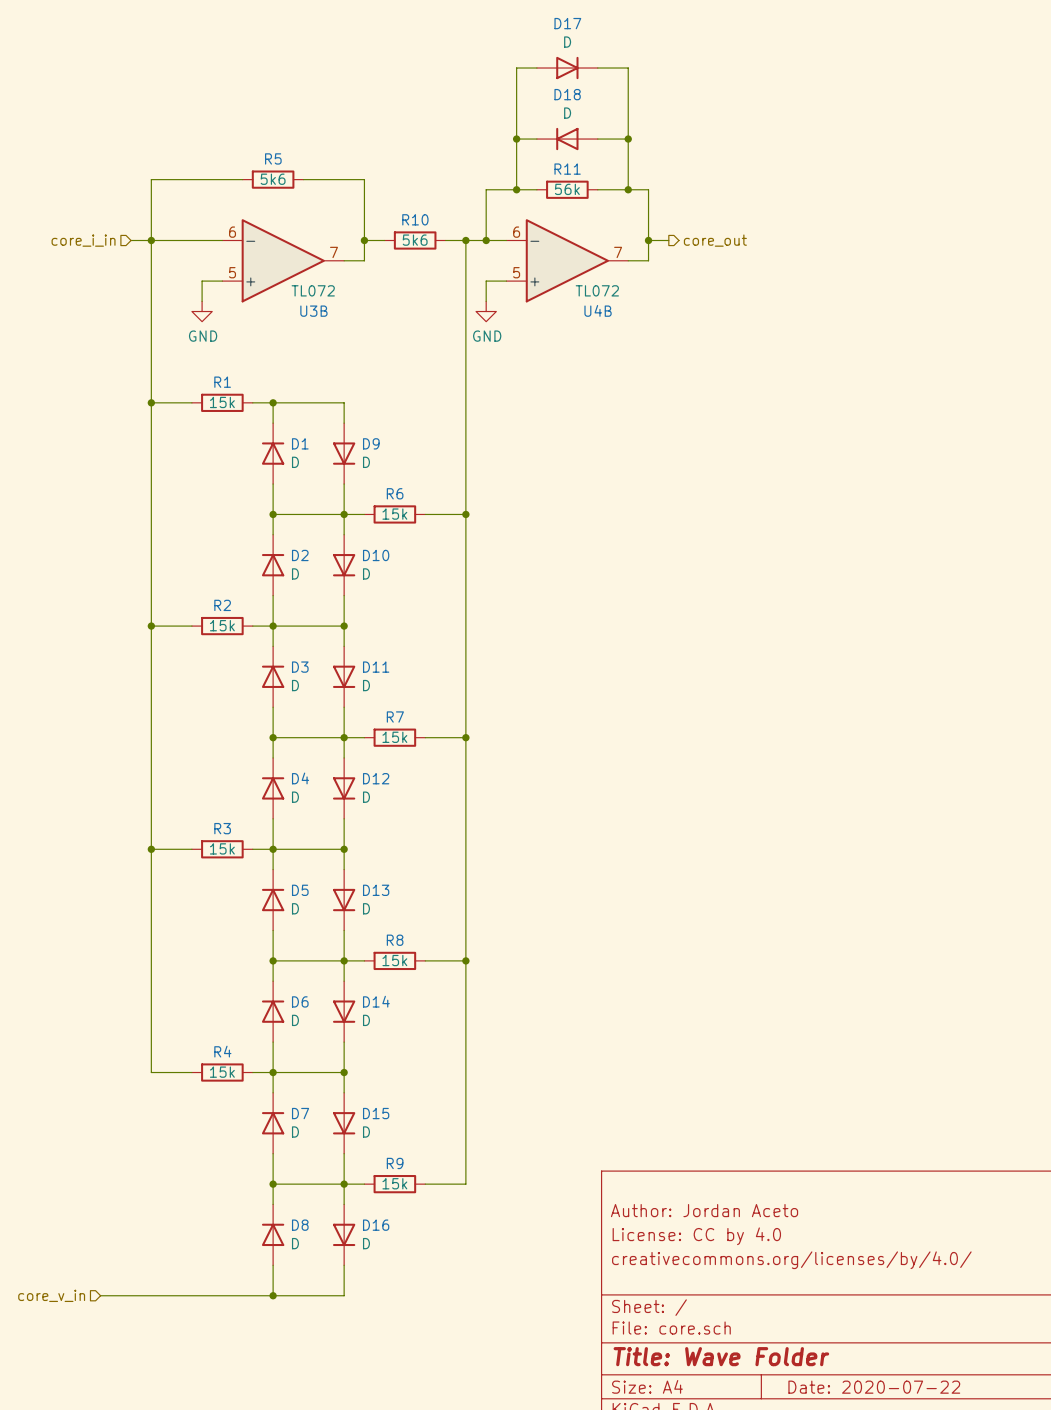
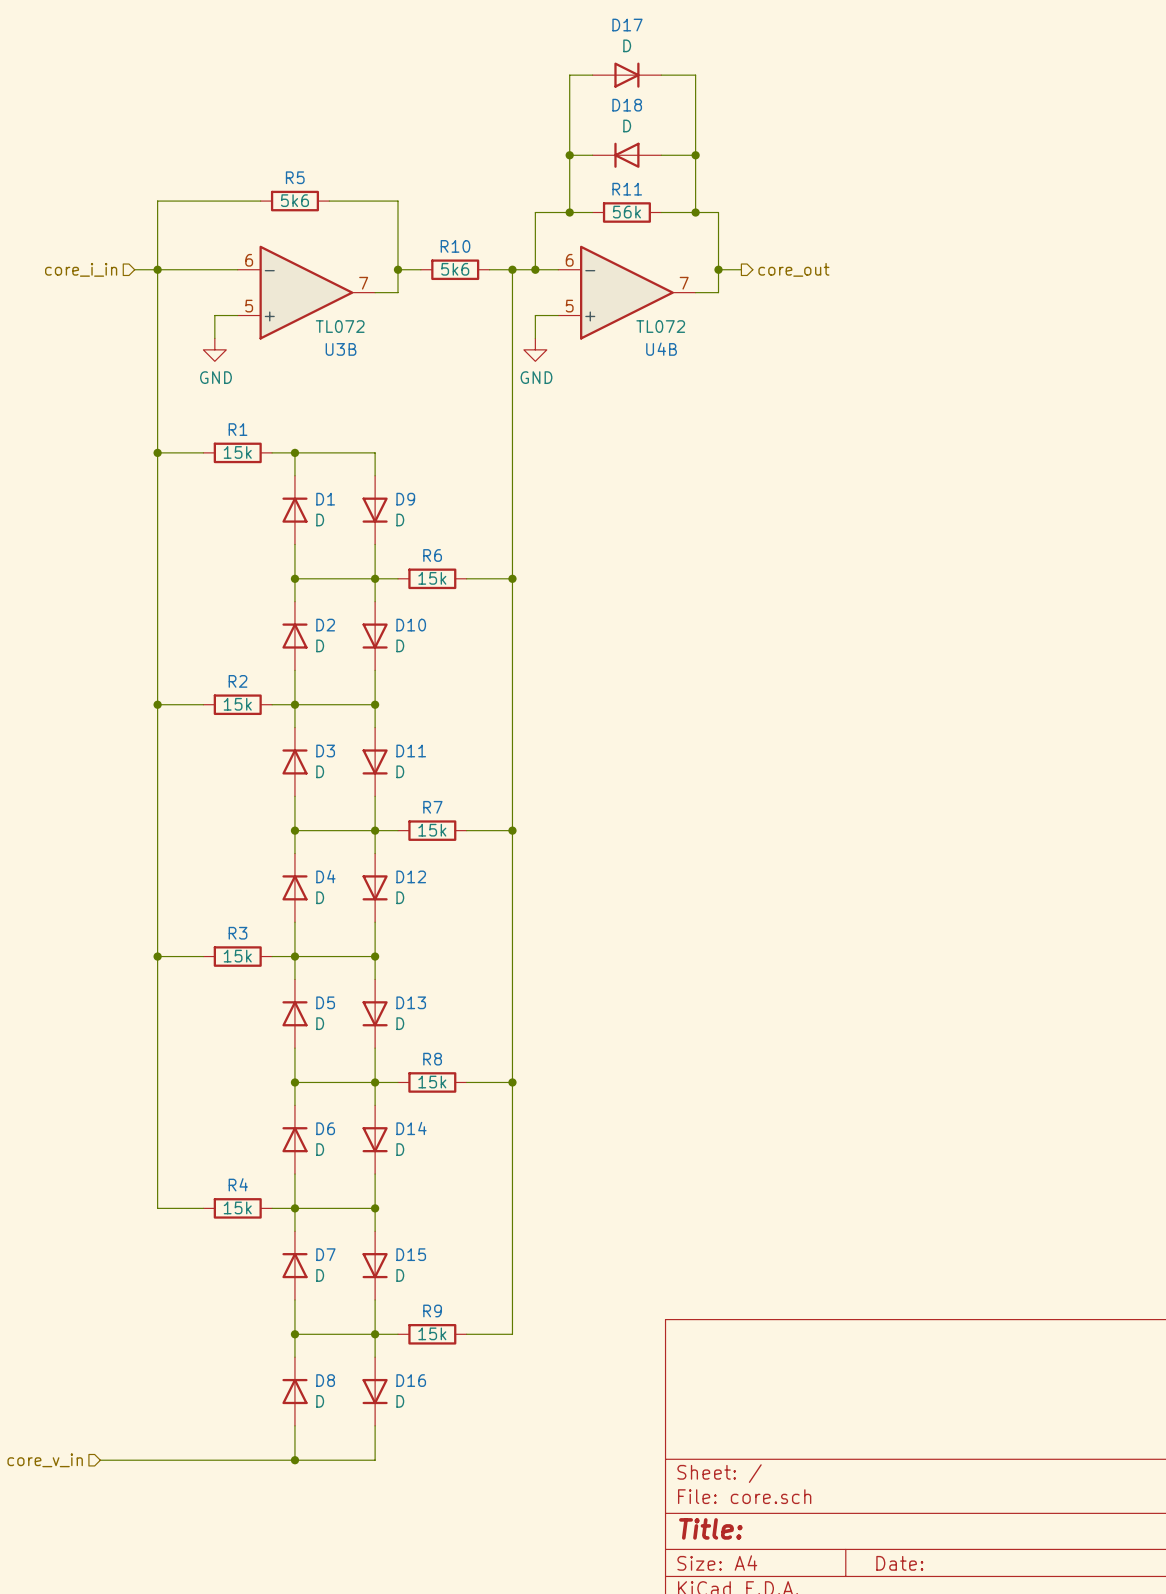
title block: Author: Jordan Aceto (704, 1210) -> none
title block: License: CC by 4.0 (696, 1236) -> none
title block: creativecommons.org/licenses/by/4.0/ (791, 1260) -> none
title block: Title: Wave Folder (721, 1356) -> Title: (710, 1528)
title block: Date: 2020-07-22 (874, 1387) -> Date: (899, 1563)

